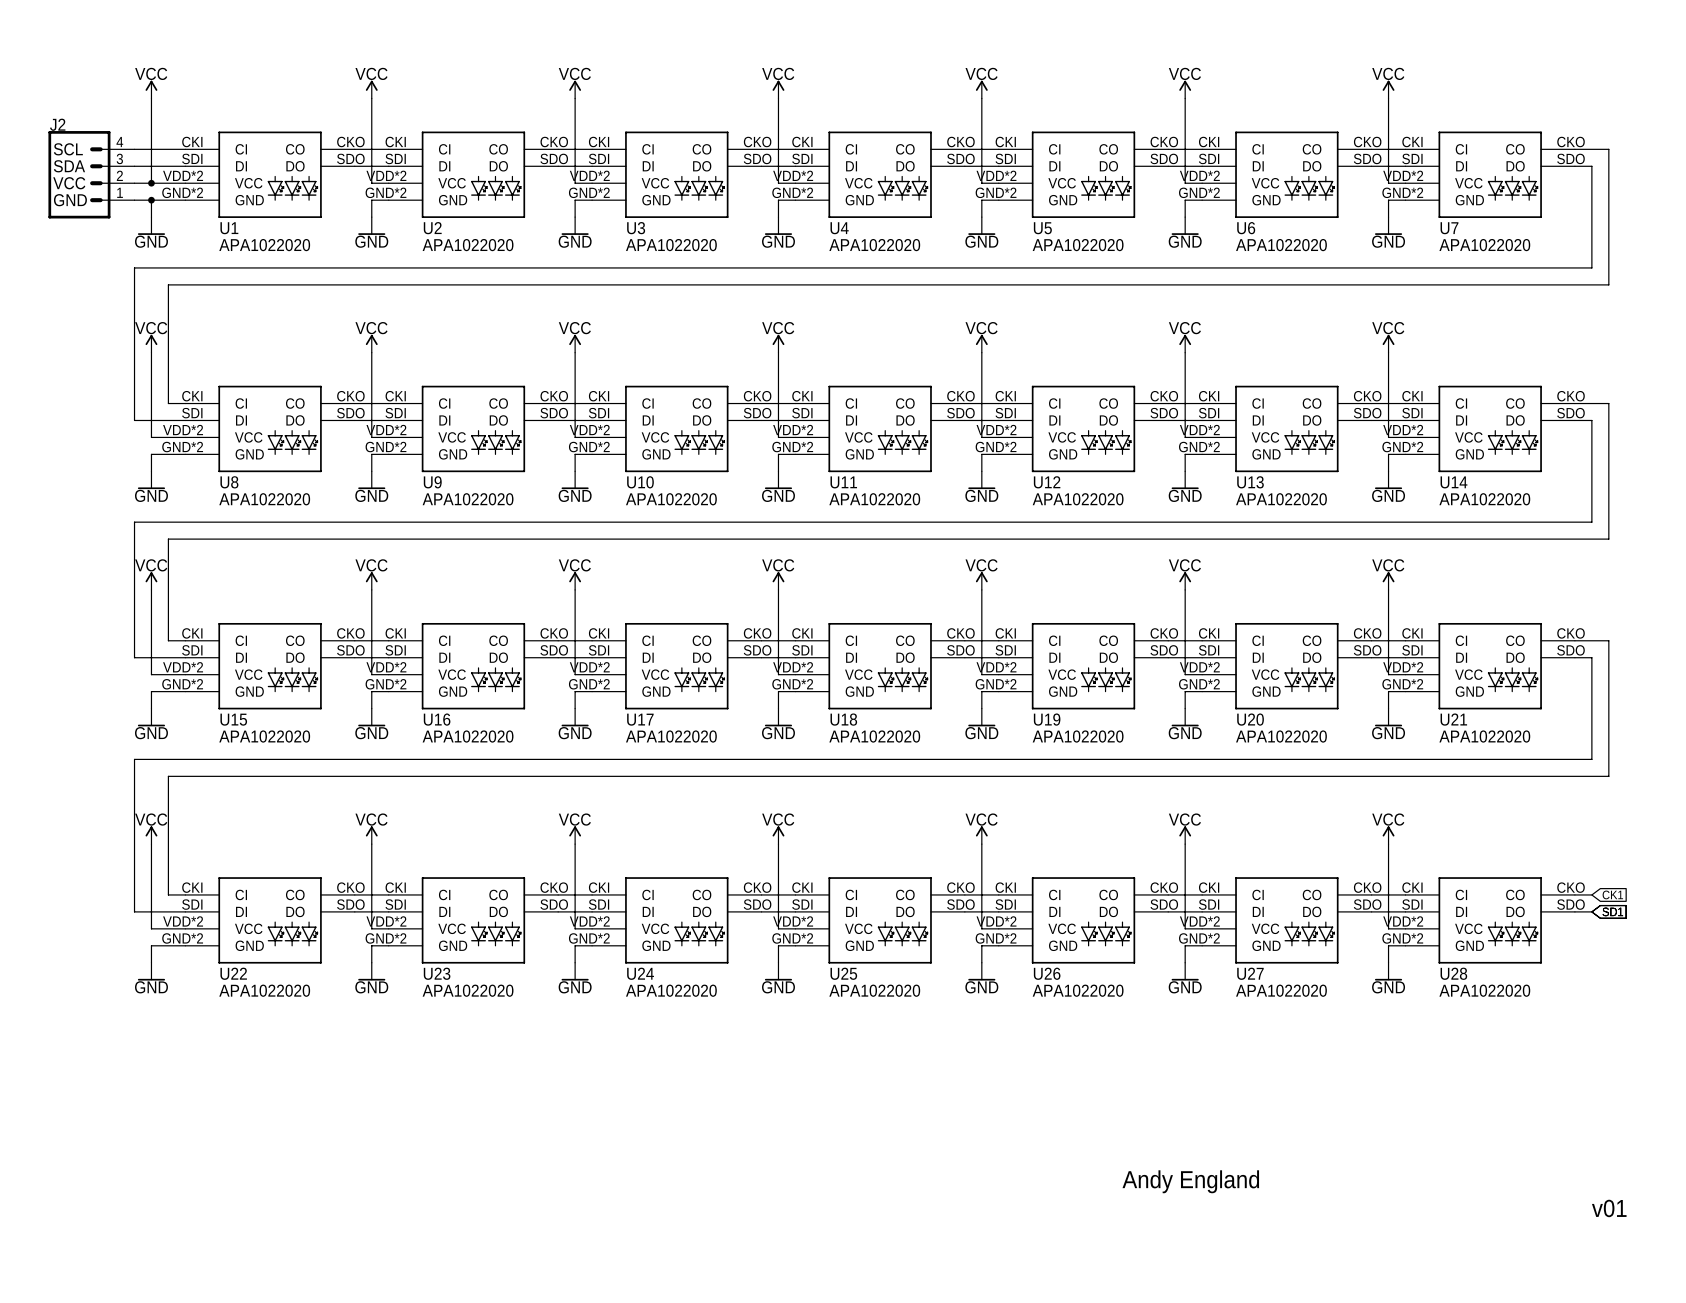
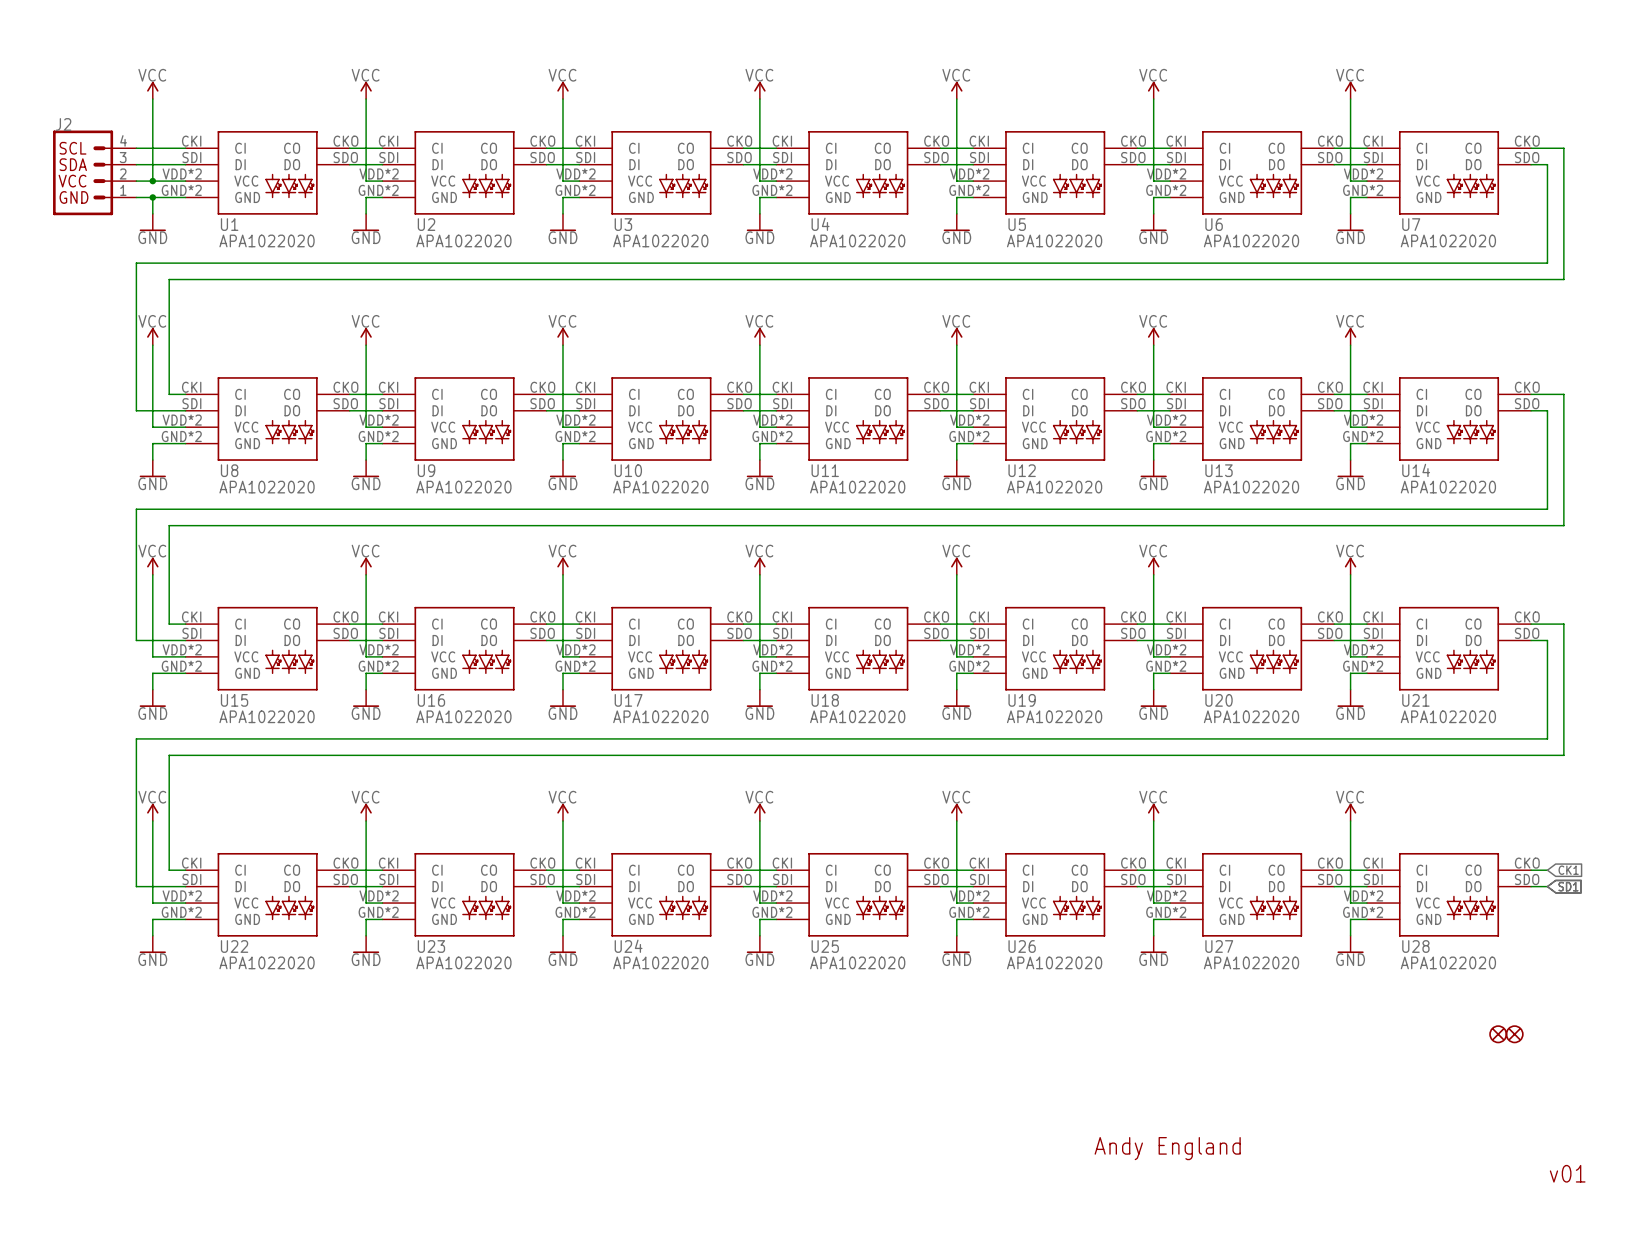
part: none -> (1498, 1034)
part: none -> (1514, 1034)

